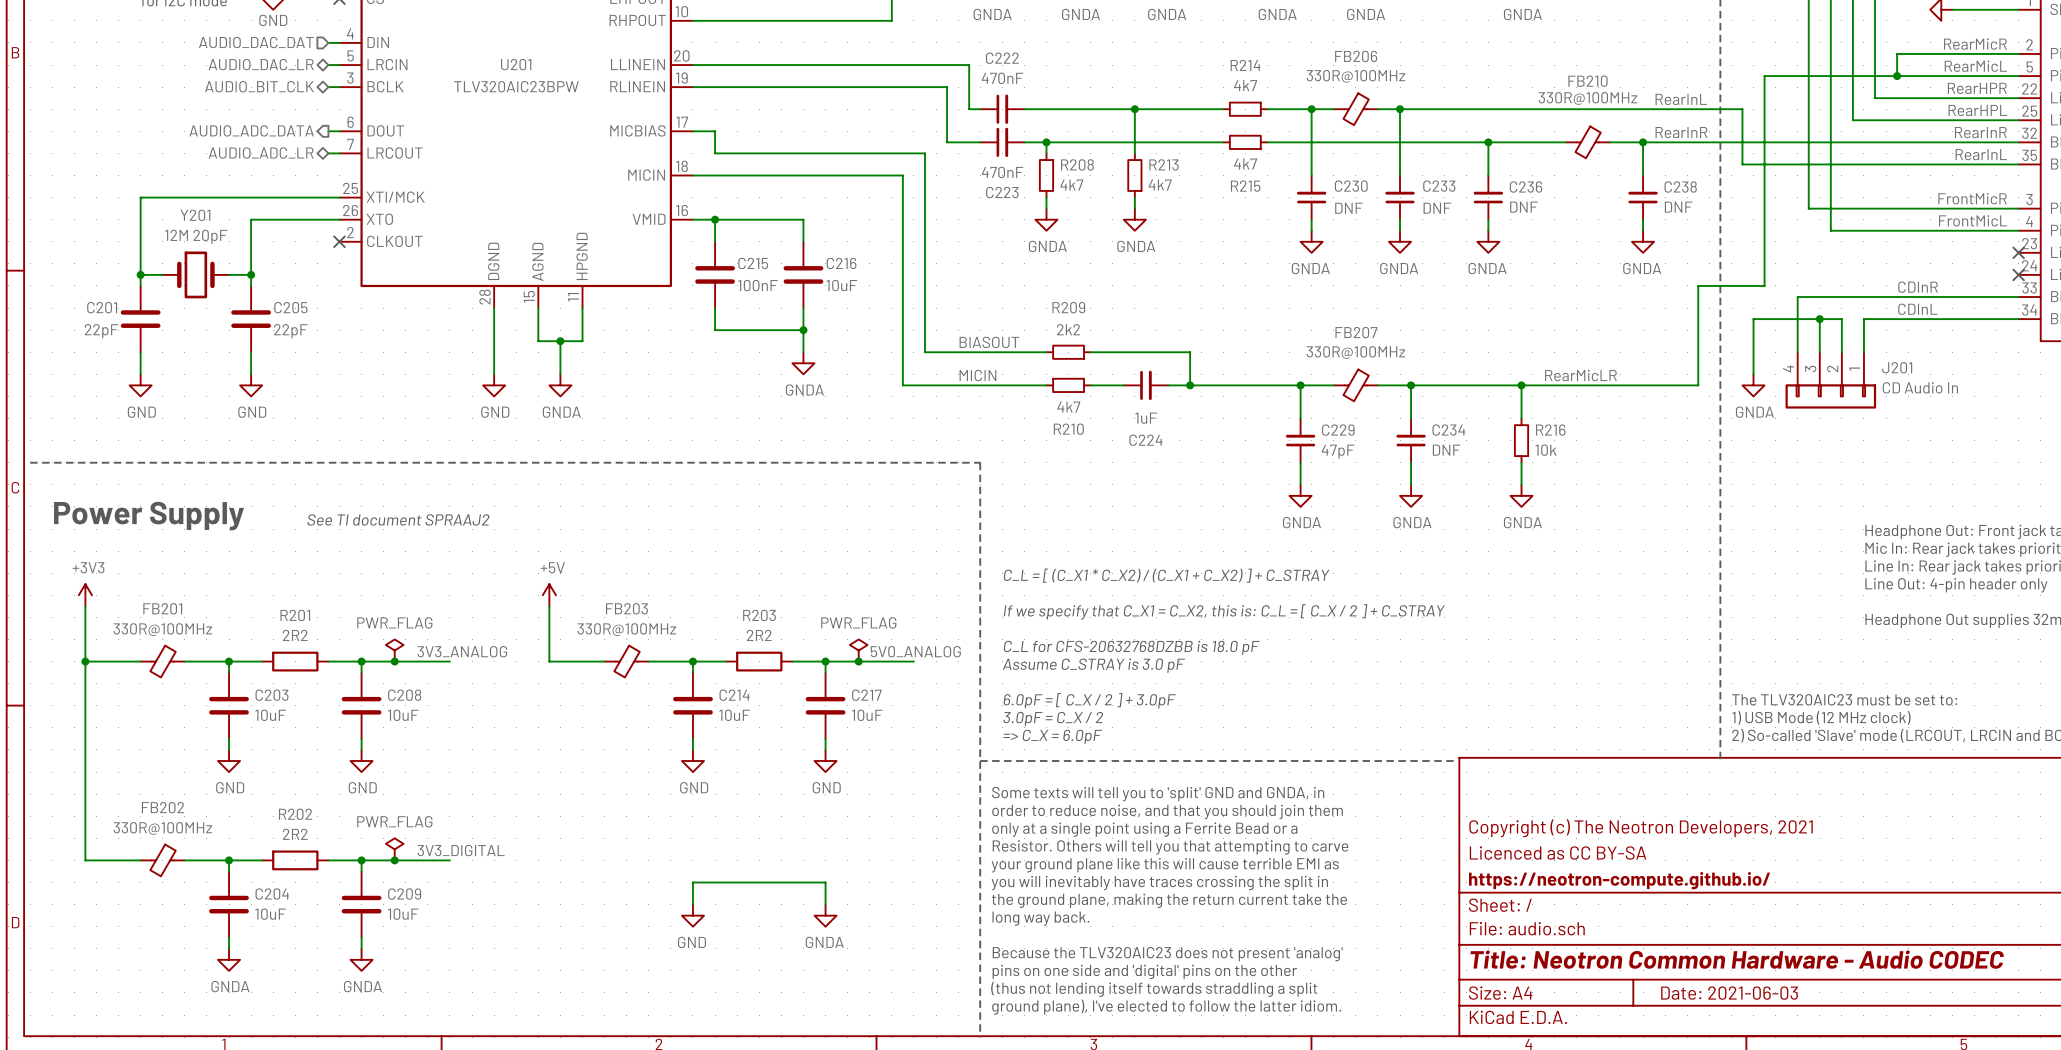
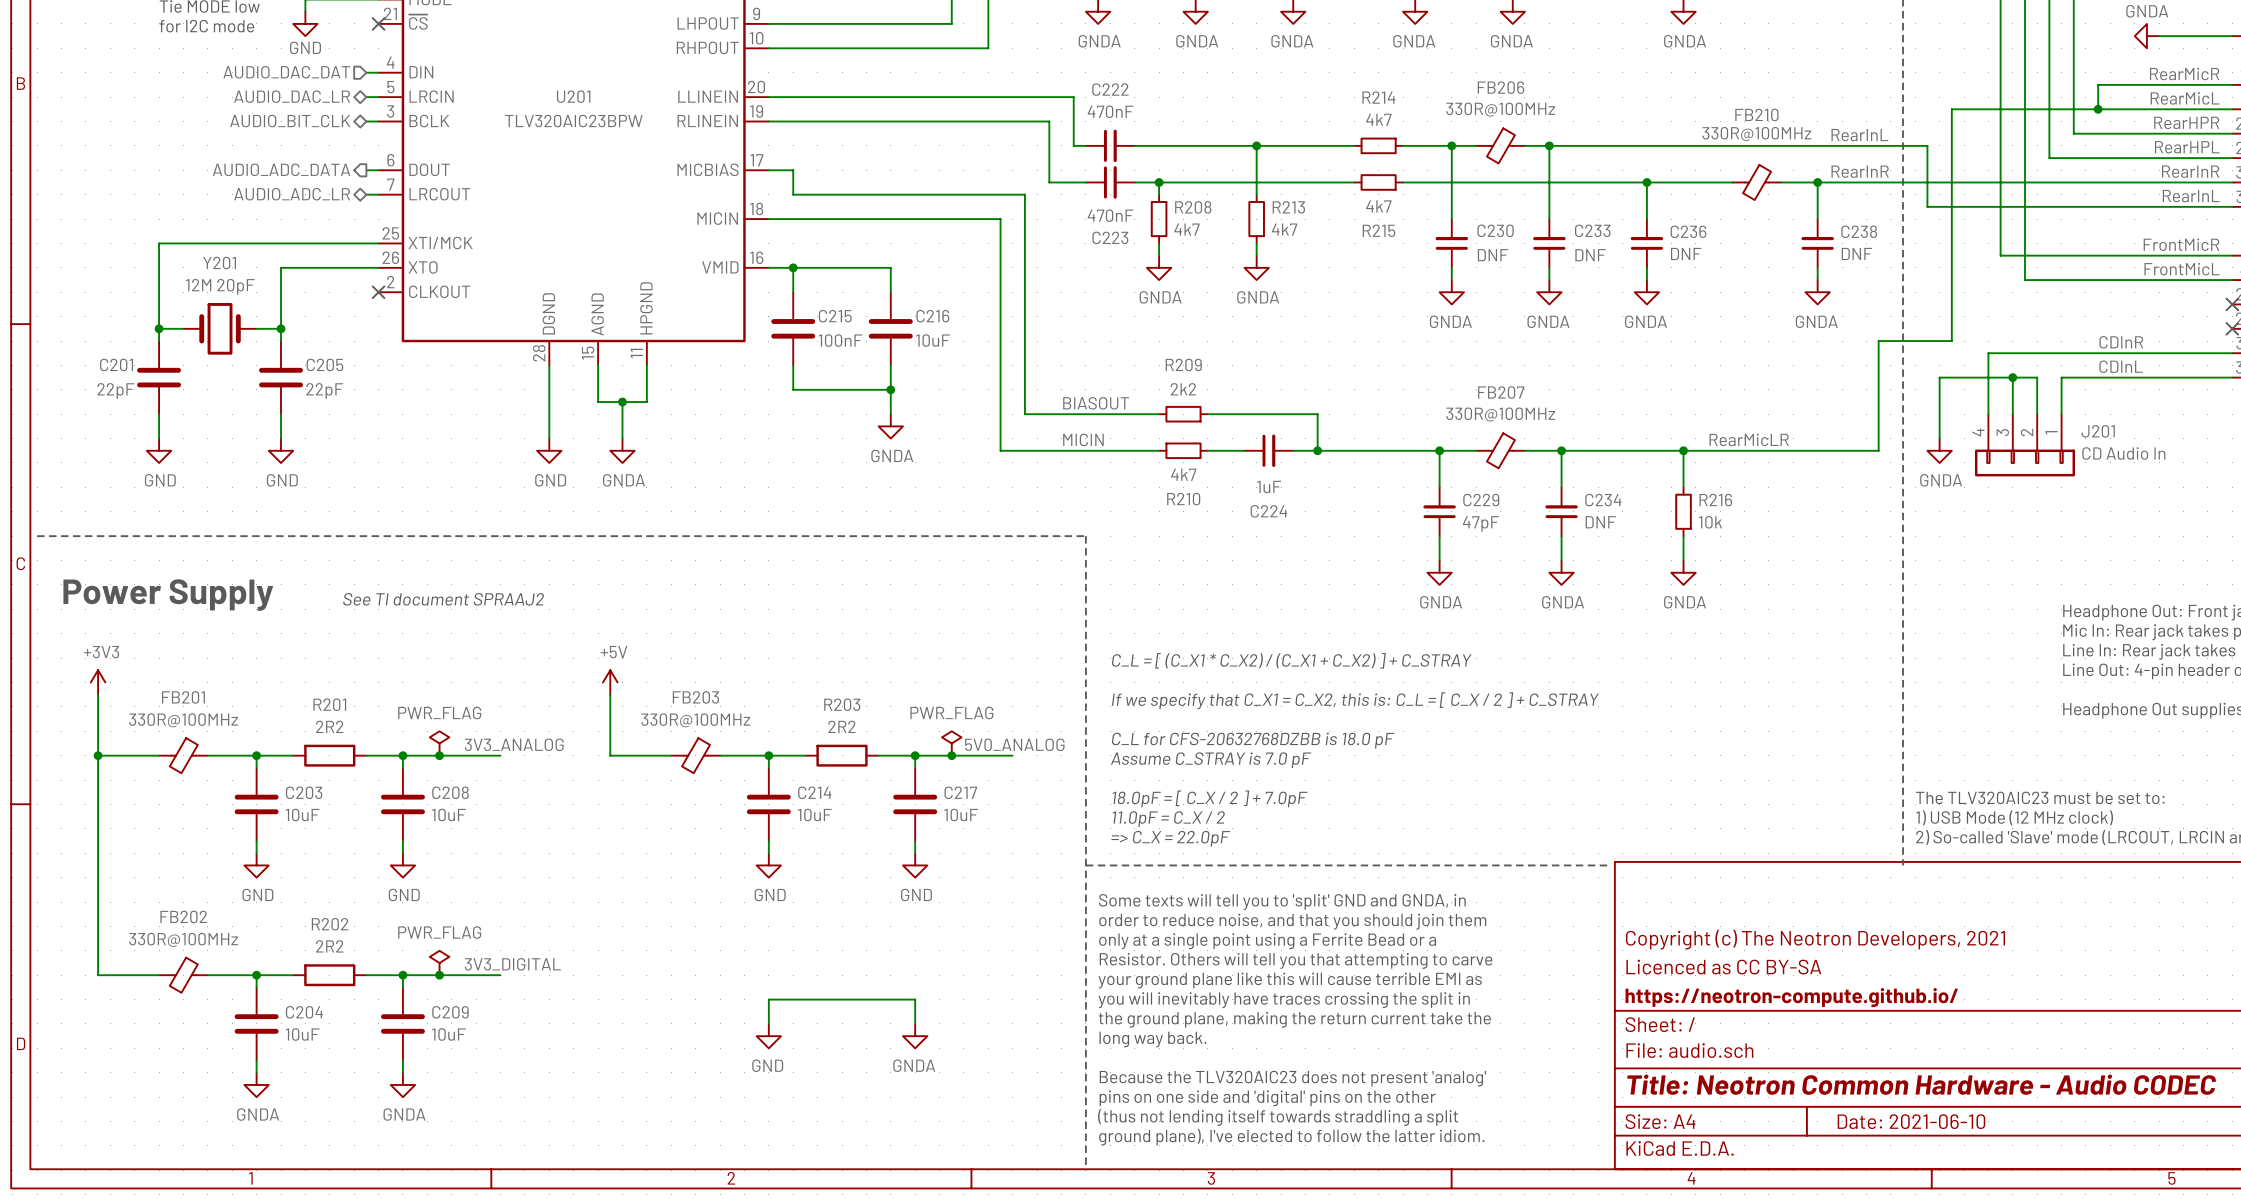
text: Assume C_STRAY is 3.0 pF (1093, 665) -> Assume C_STRAY is 7.0 pF (1211, 760)
text: 6.0pF = [ C_X / 2 ] + 3.0pF (1089, 700) -> 18.0pF = [ C_X / 2 ] + 7.0pF (1210, 798)
text: 3.0pF = C_X / 2 (1053, 719) -> 11.0pF = C_X / 2 (1168, 819)
text: => C_X = 6.0pF (1052, 736) -> => C_X = 22.0pF (1170, 838)
title block: Date: 2021-06-03 (1729, 993) -> Date: 2021-06-10 (1911, 1121)

